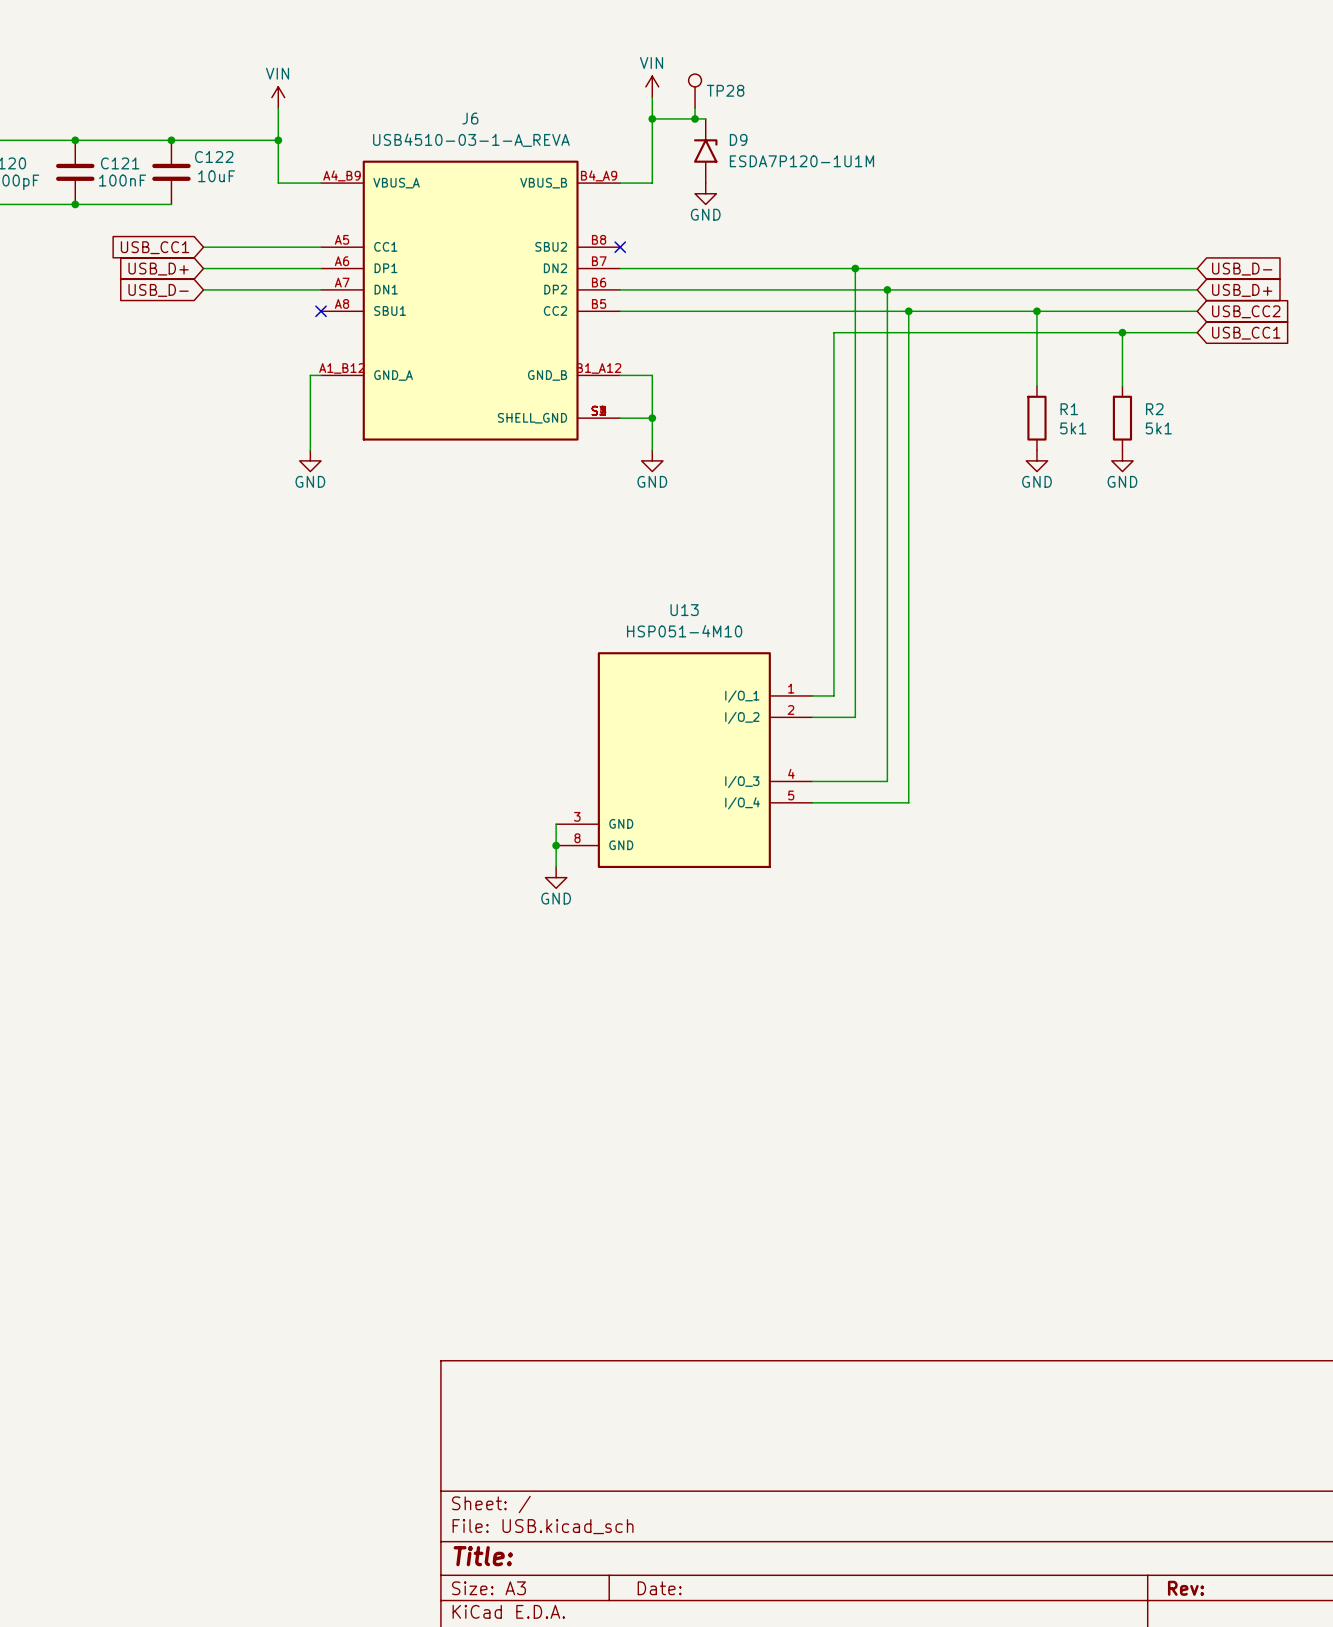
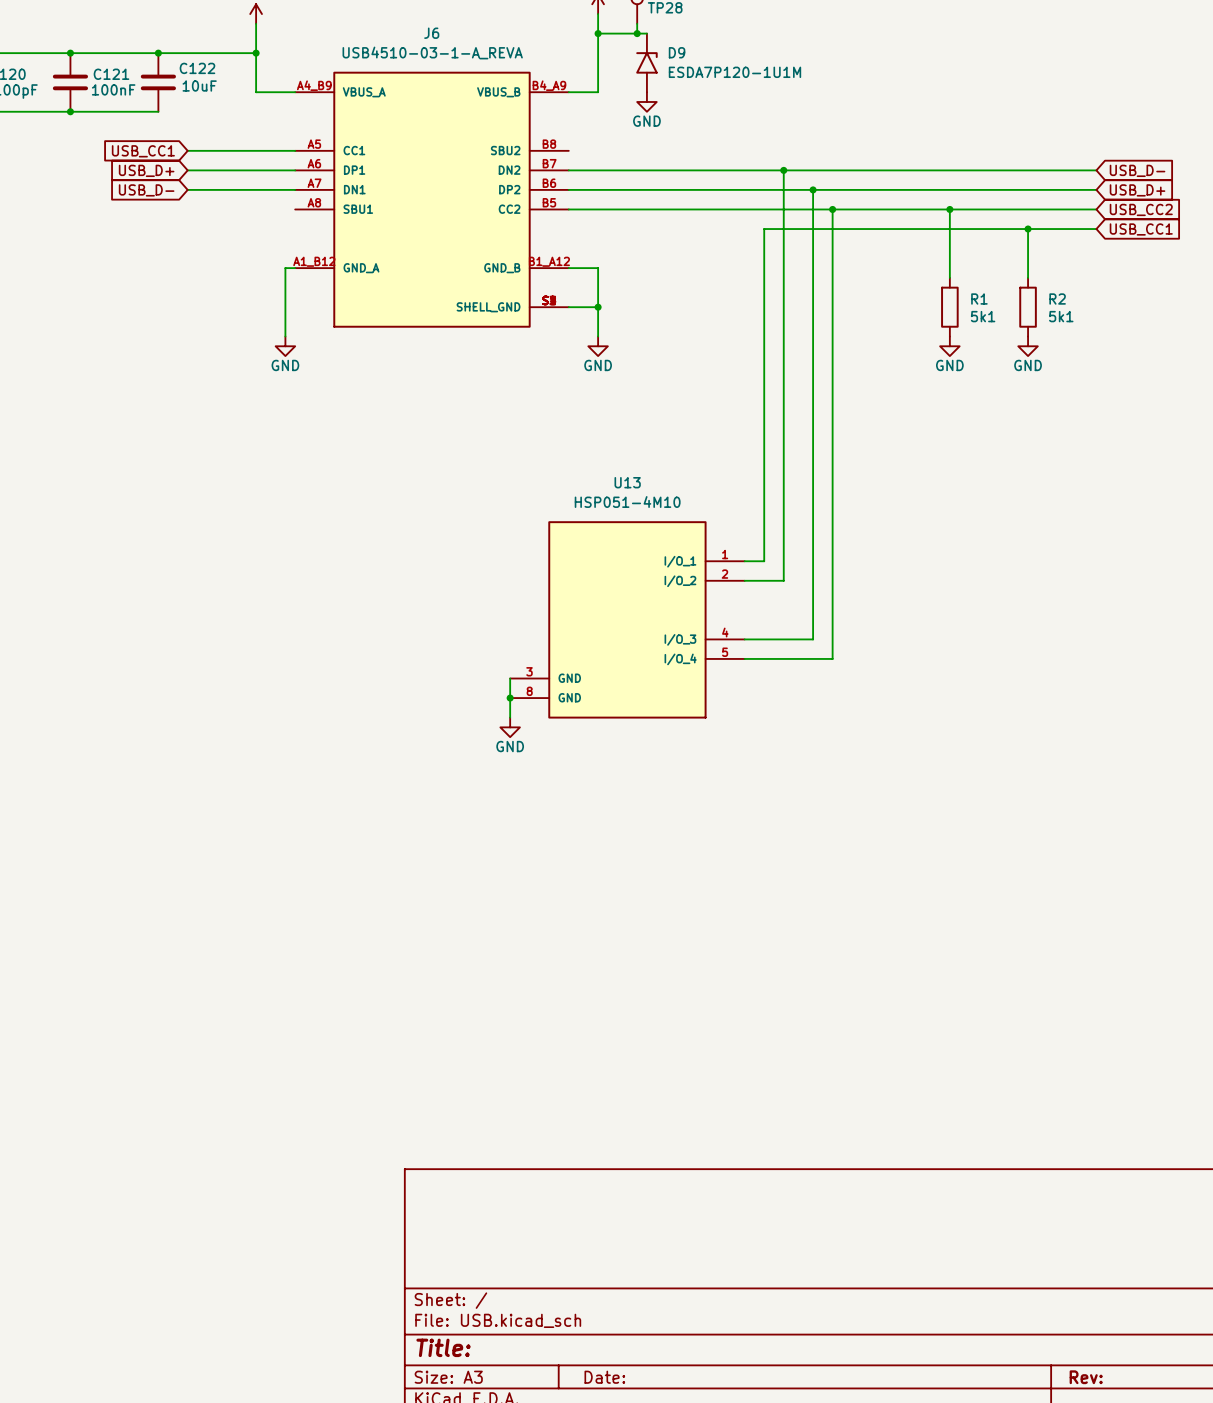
no-connect mark: (620, 247) -> none
no-connect mark: (321, 311) -> none

